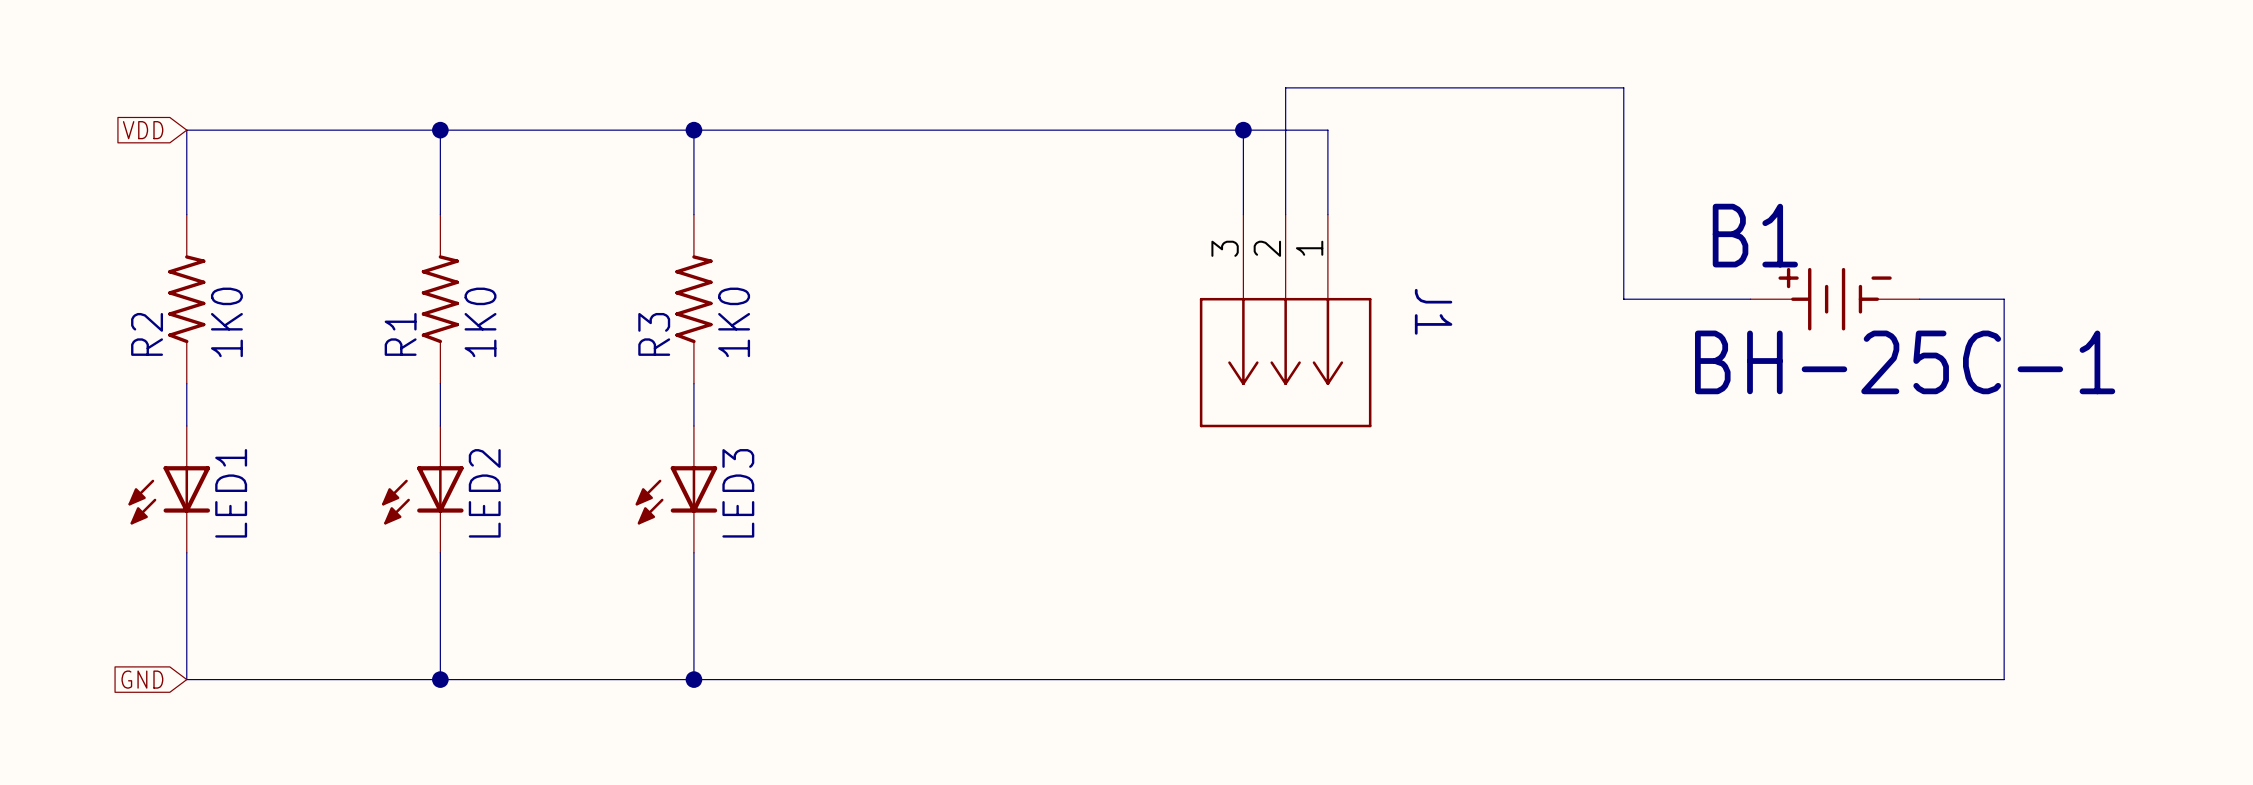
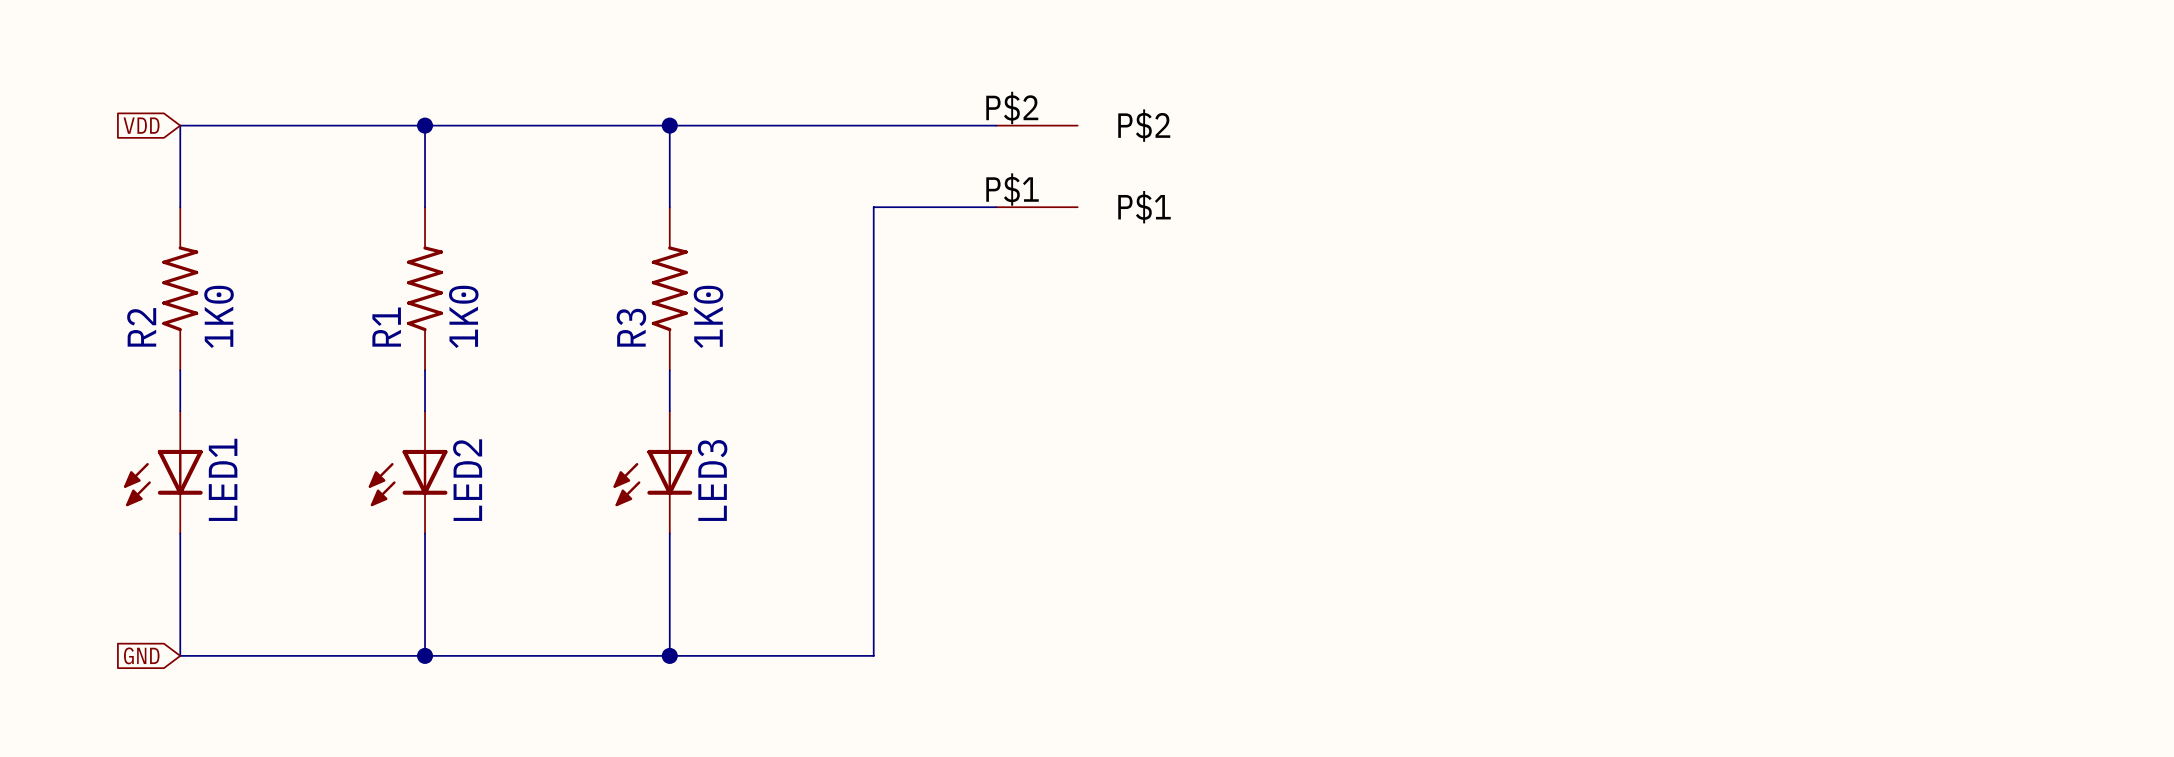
wire: (1032, 130) (1327, 130) (1327, 214) -> none
wire: (1243, 130) (1243, 214) -> none
junction: (1243, 130) -> none
part: none -> (1036, 166)
wire: (1285, 214) (1285, 87) (1623, 87) (1623, 299) (1750, 299) -> none
B1: BH-25C-1 (1835, 299) -> none
wire: (1919, 299) (2004, 299) (2004, 679) (905, 679) -> (996, 207) (873, 207) (873, 655)
J1: (1285, 320) -> none

